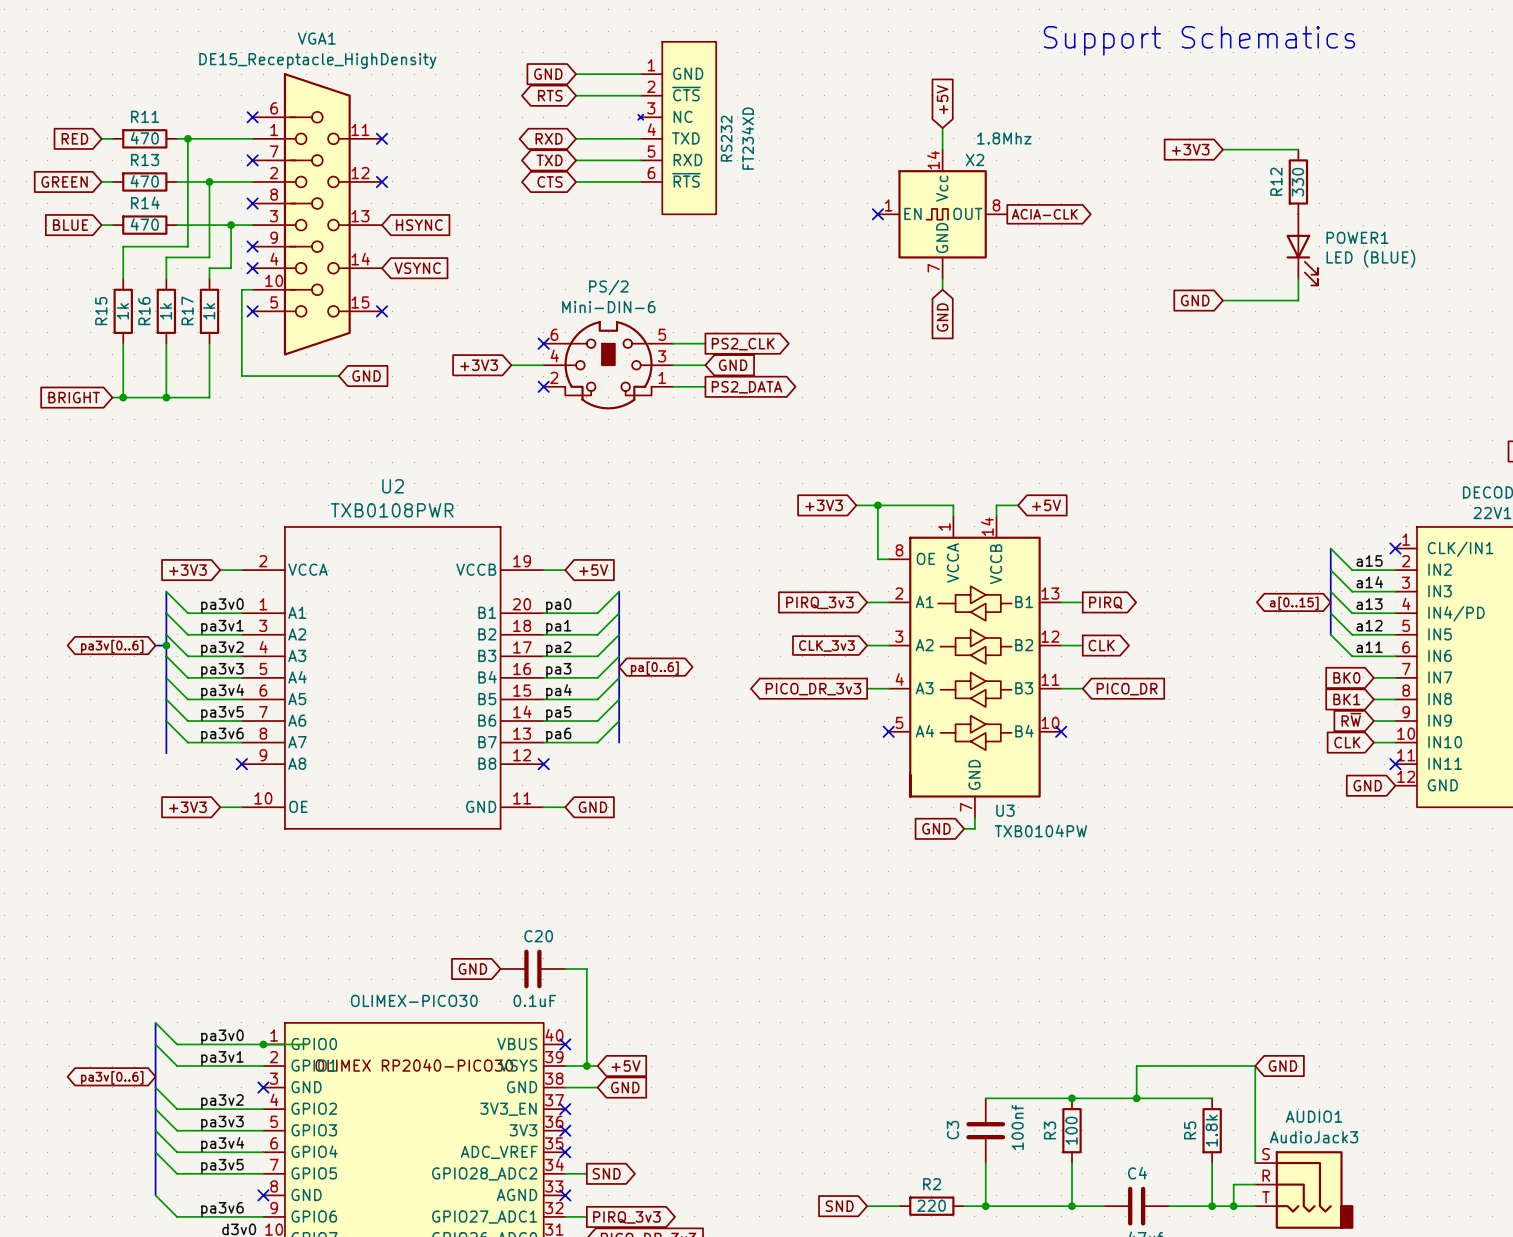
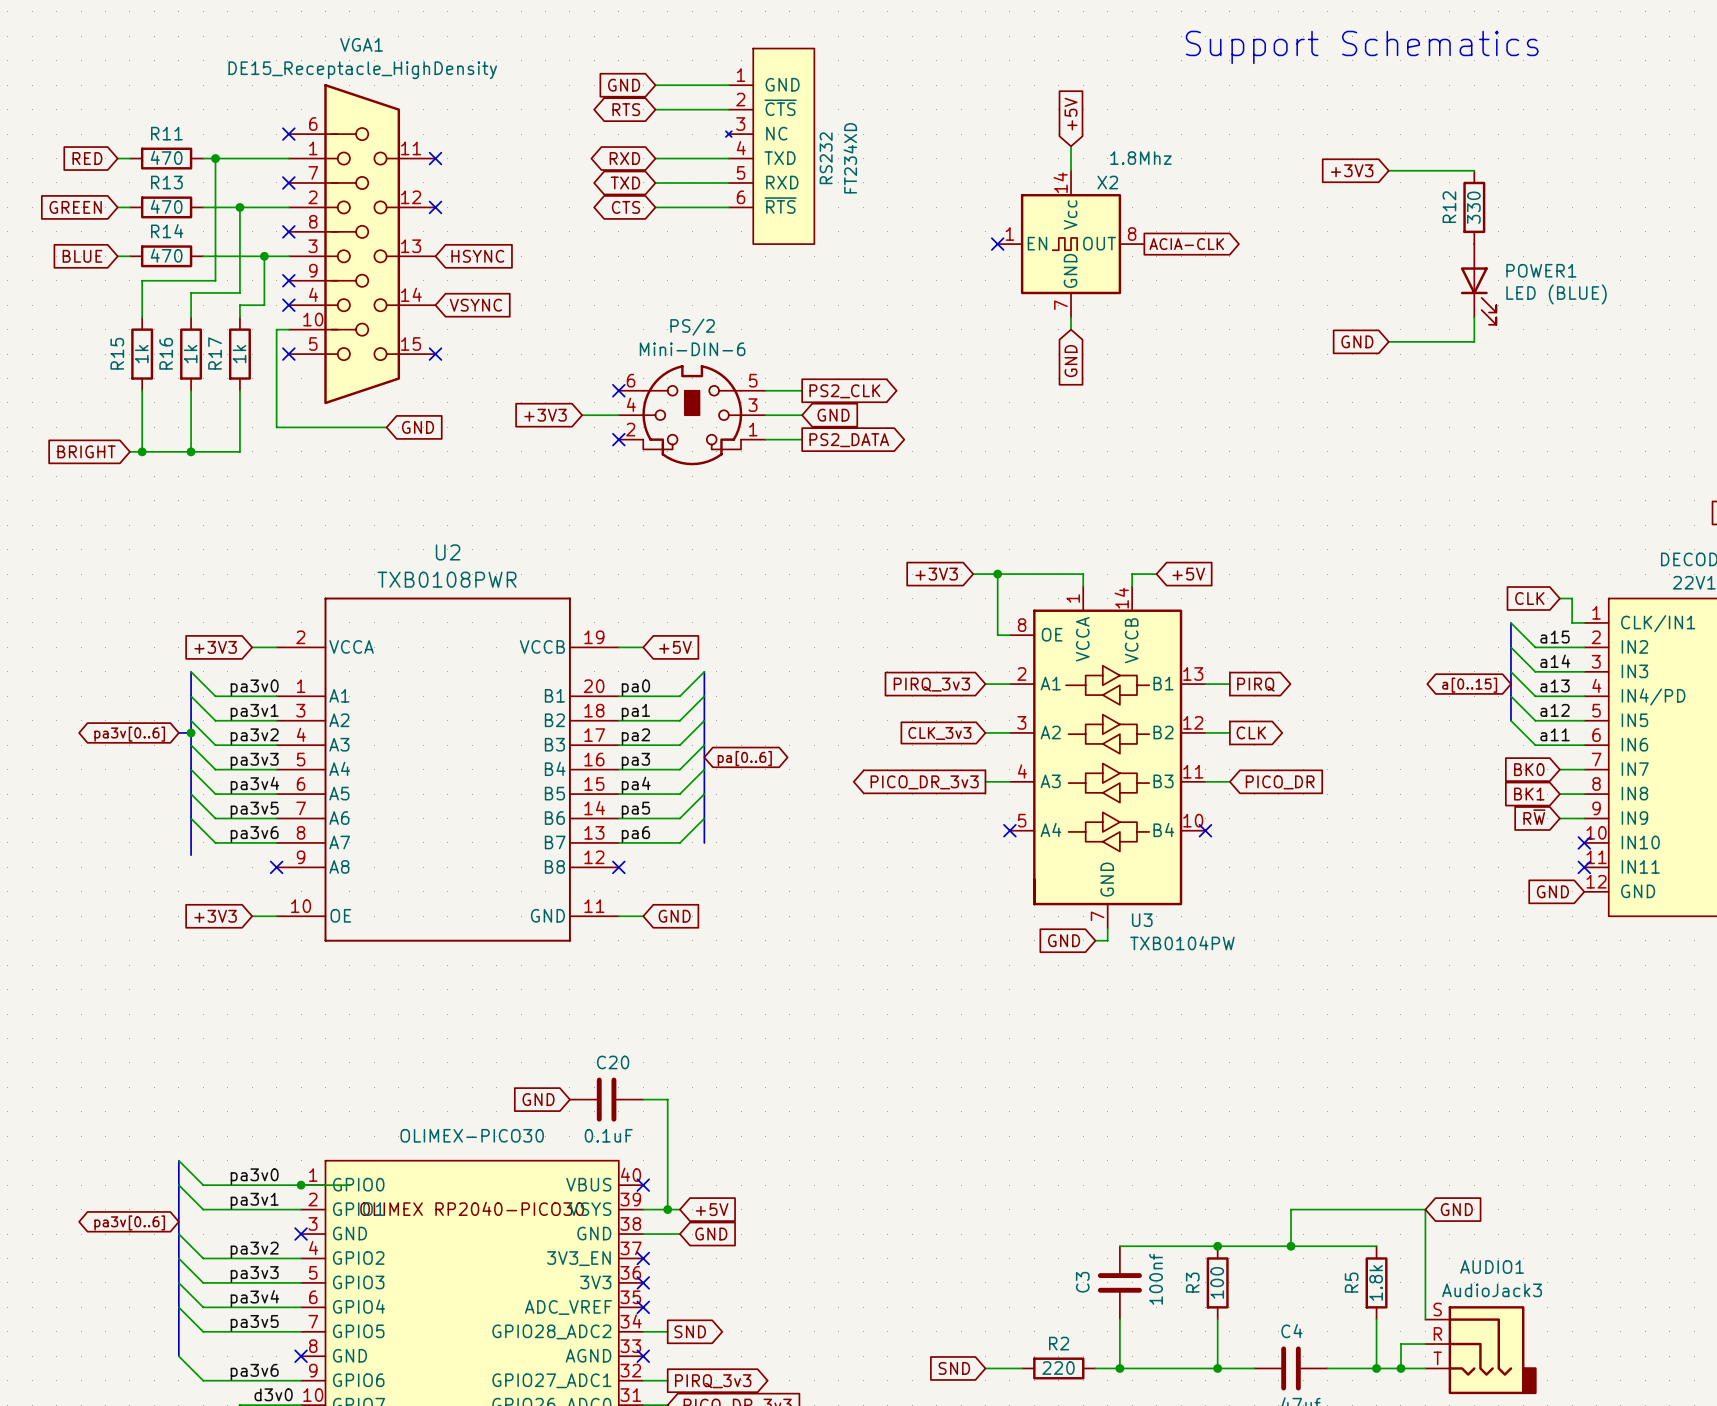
global label: none -> CLK (1529, 598)
wire: none -> (1559, 598) (1572, 598) (1572, 622) (1584, 622)
no-connect mark: (1395, 548) -> none
global label: CLK (1347, 742) -> none
wire: (1373, 742) (1395, 742) -> none
no-connect mark: none -> (1584, 842)

